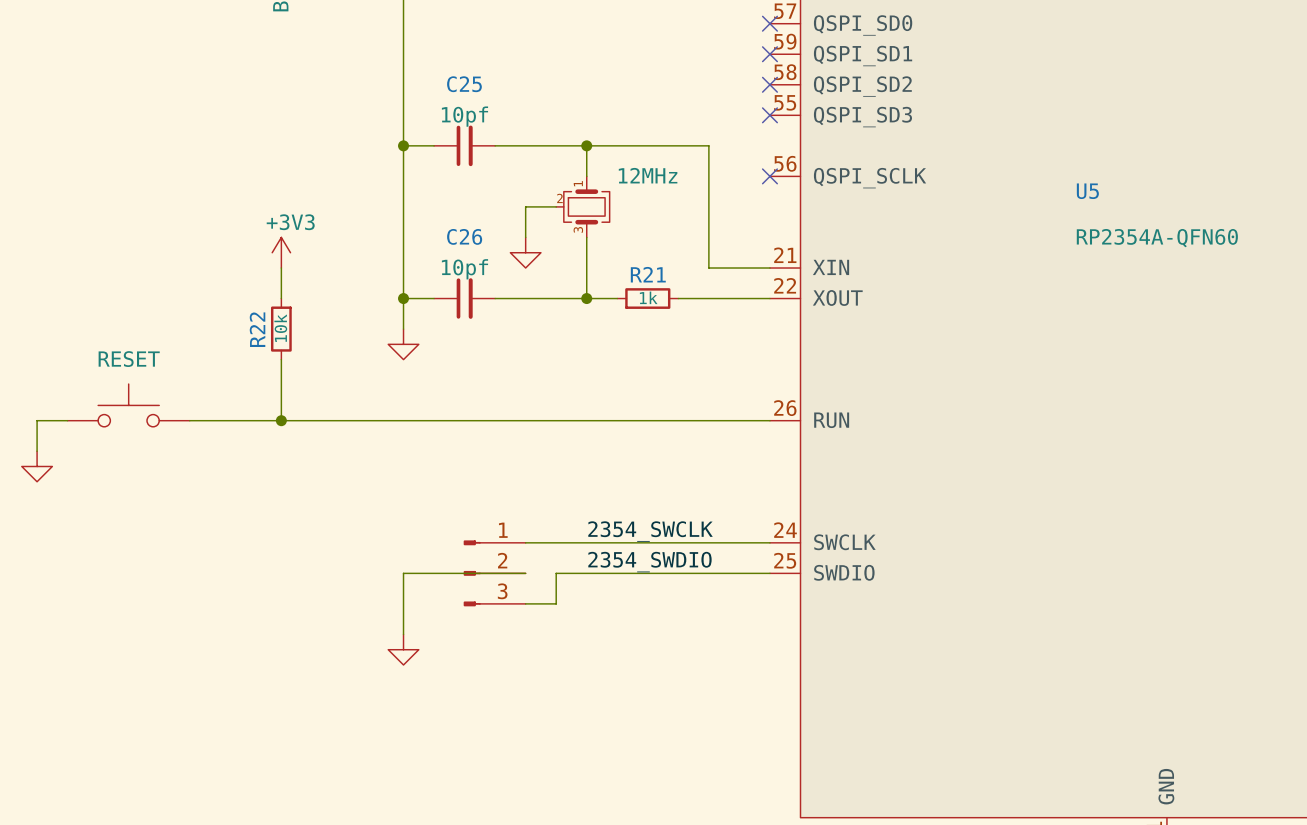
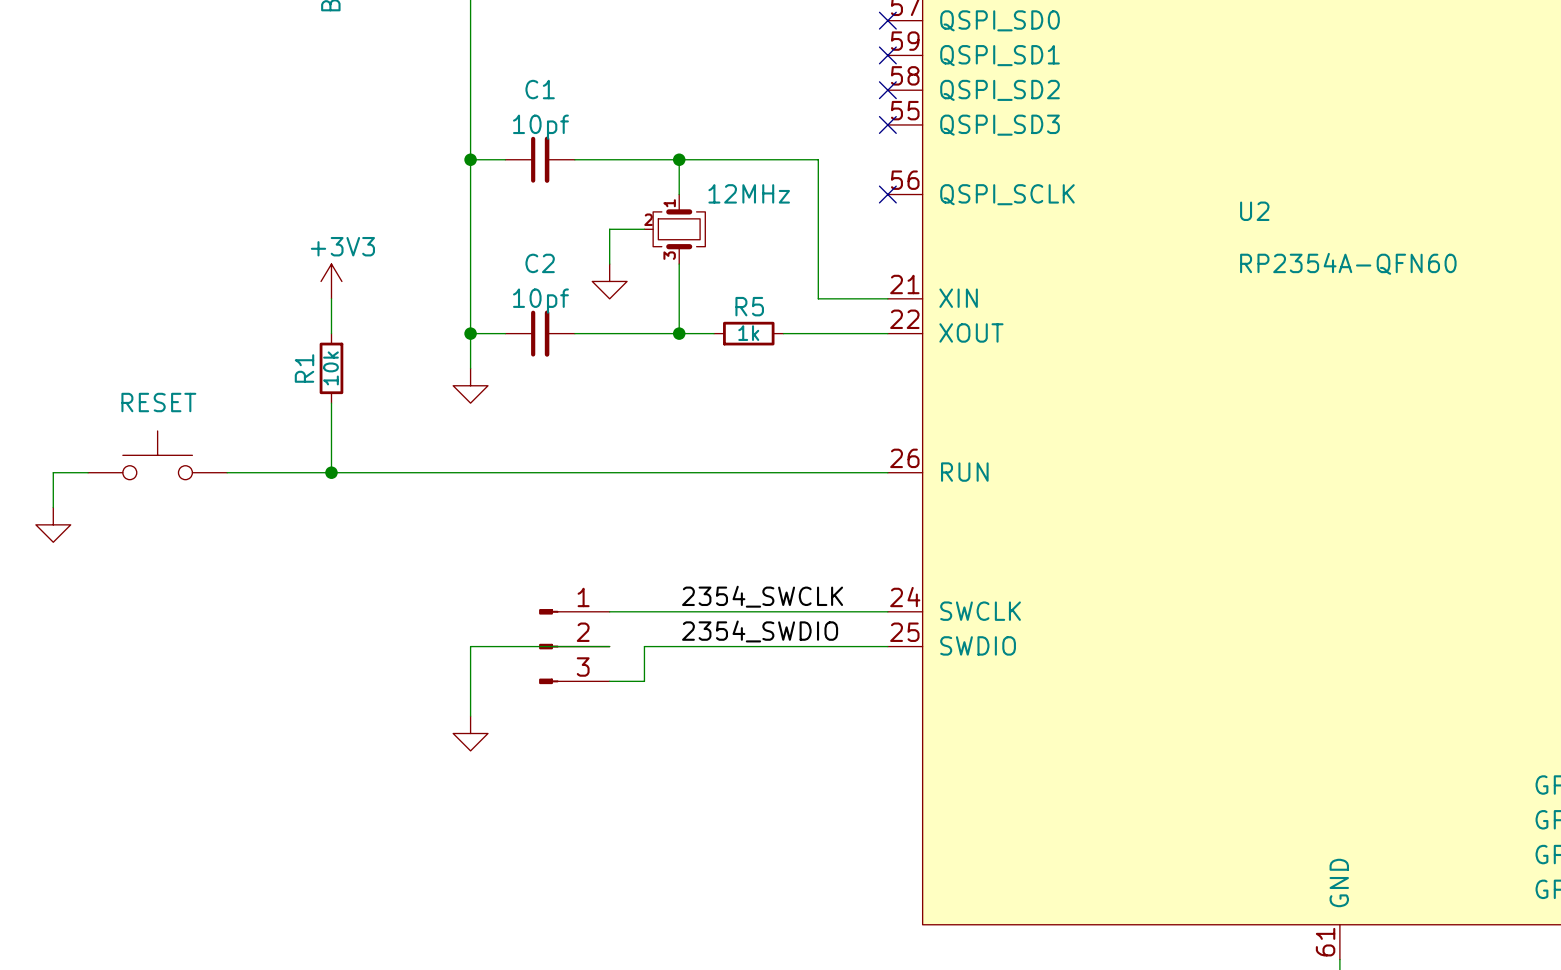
C25 name: C25 (464, 84) -> C1 (540, 89)
U5 name: U5 (1087, 191) -> U2 (1254, 211)
C26 name: C26 (464, 236) -> C2 (540, 263)
R21 name: R21 (648, 274) -> R5 (749, 306)
R22 name: R22 (257, 329) -> R1 (304, 368)

